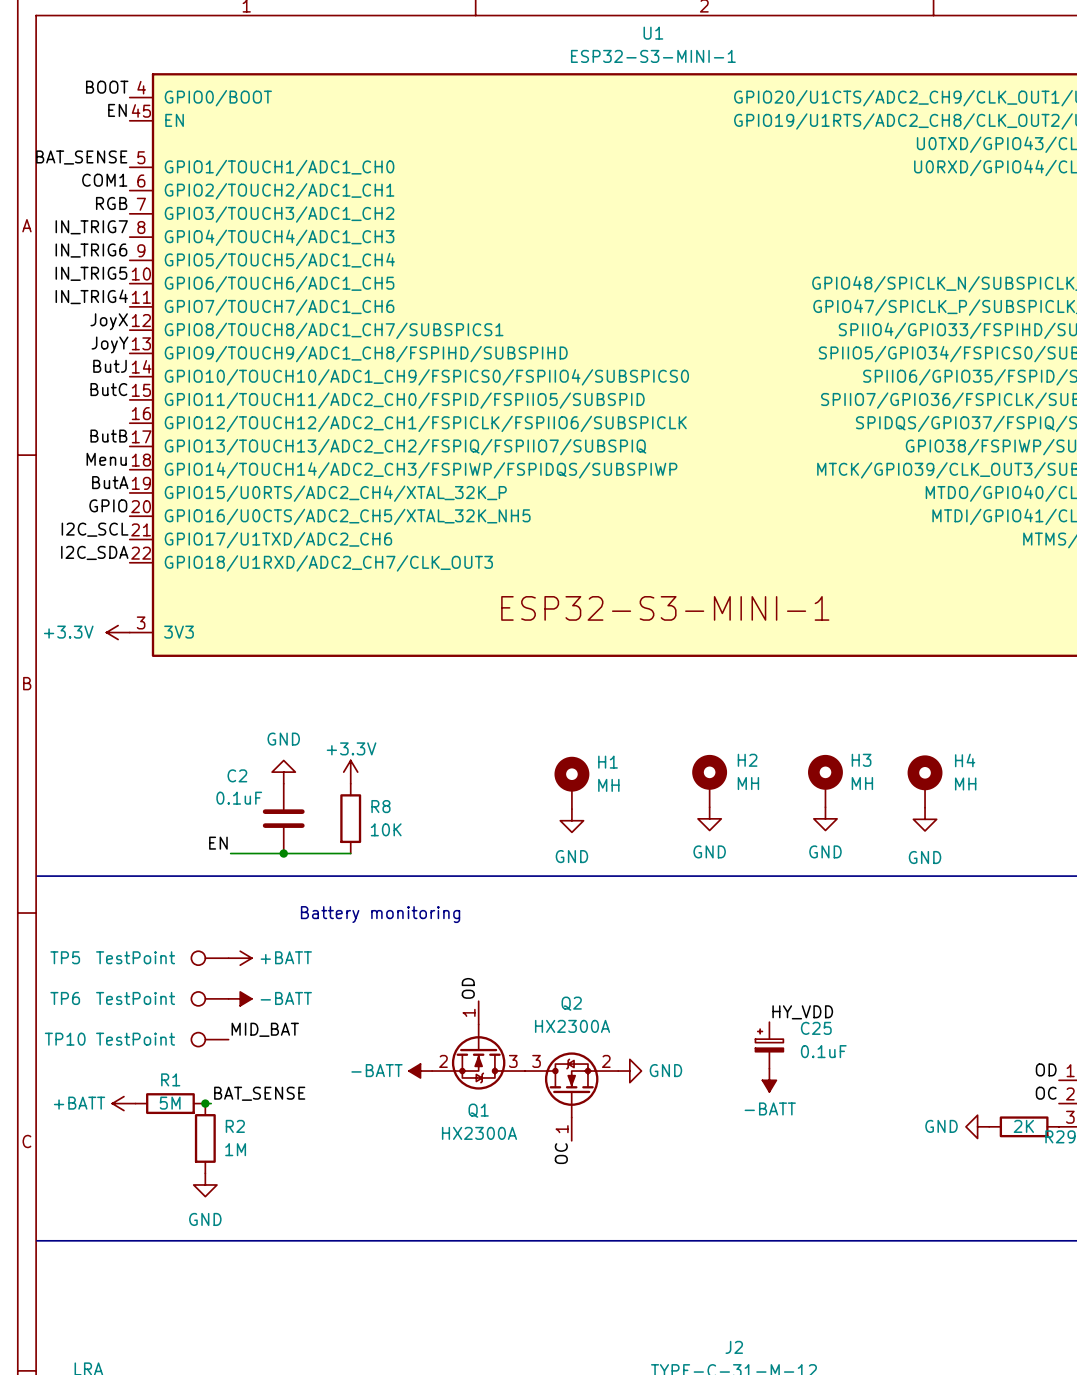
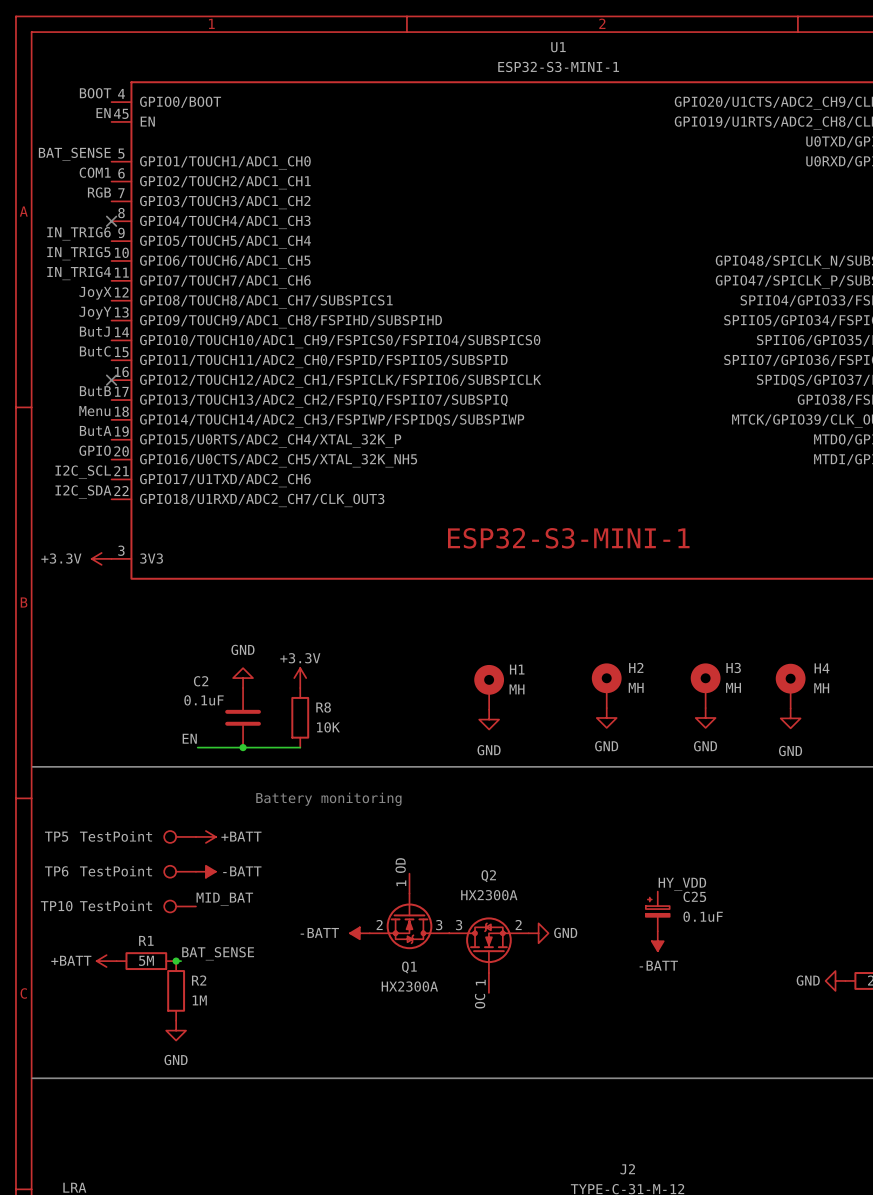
label: IN_TRIG7 (91, 227) -> none
no-connect mark: none -> (111, 221)
no-connect mark: none -> (111, 380)

